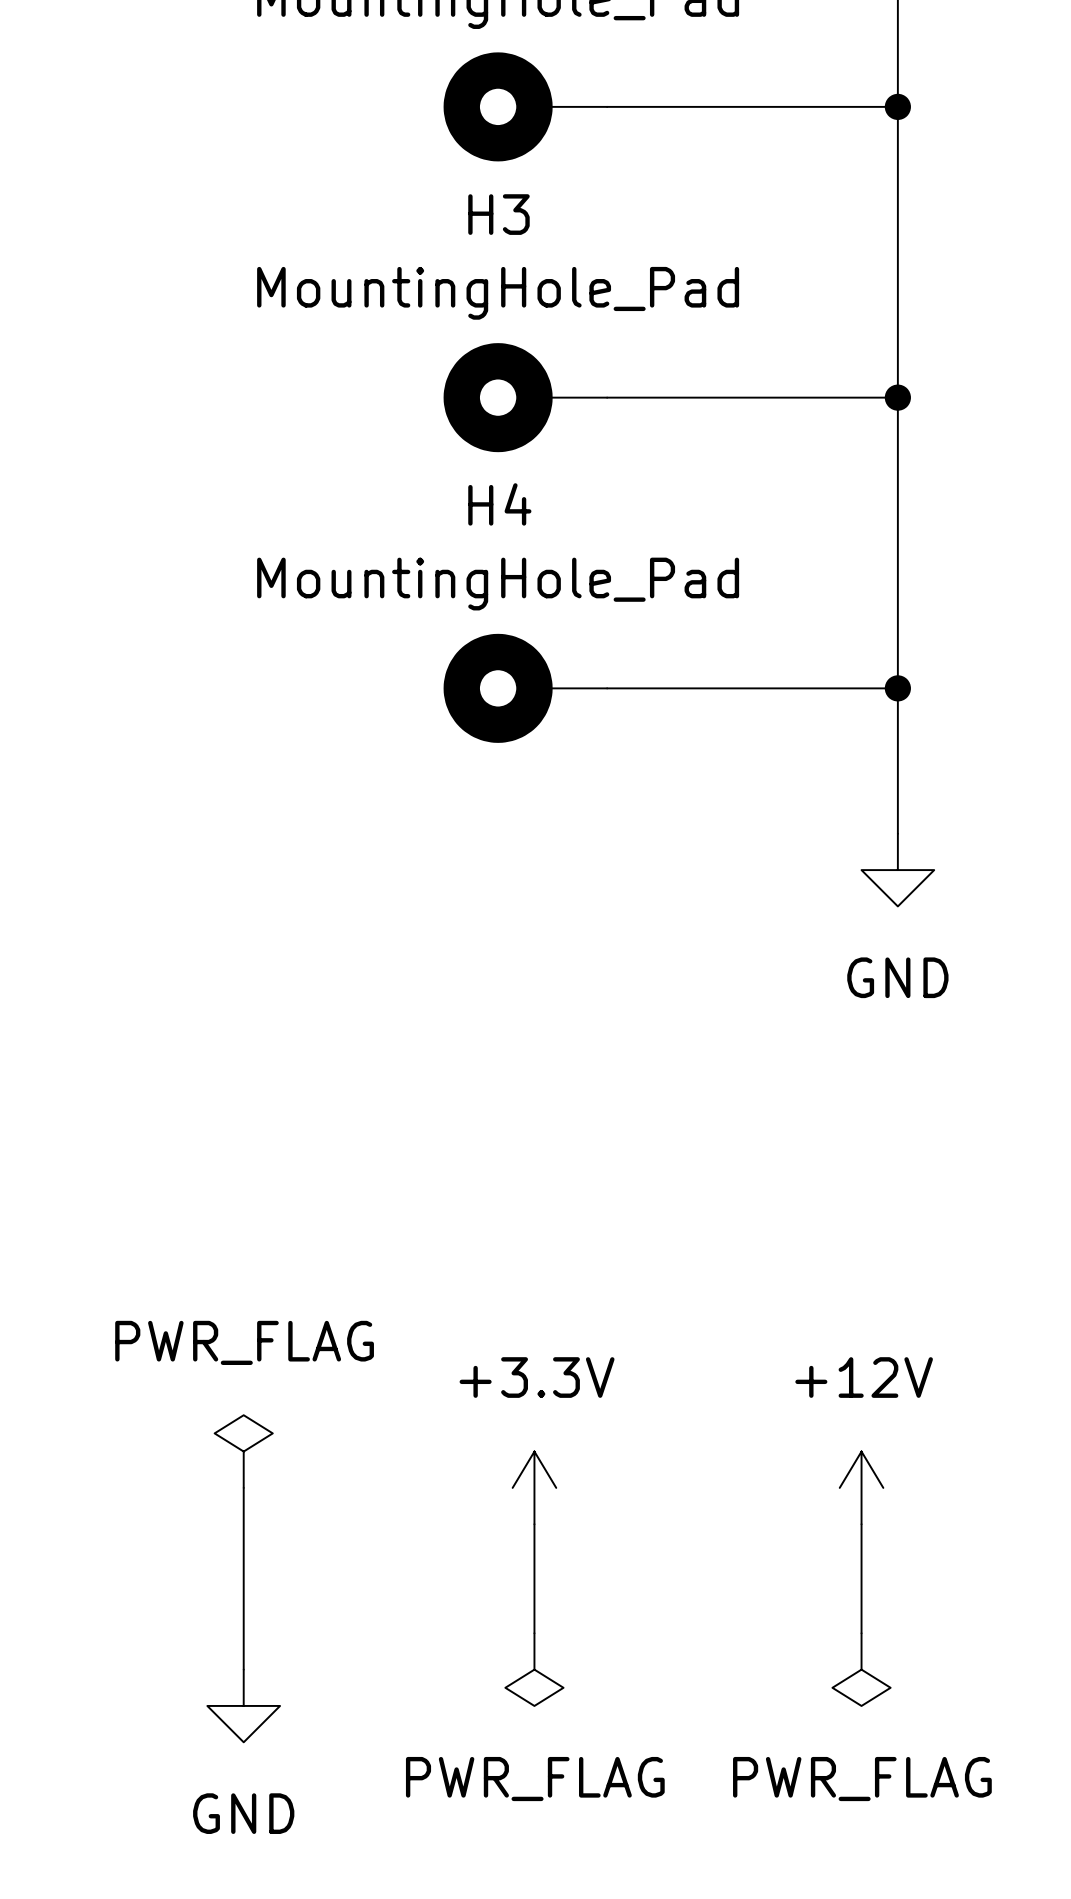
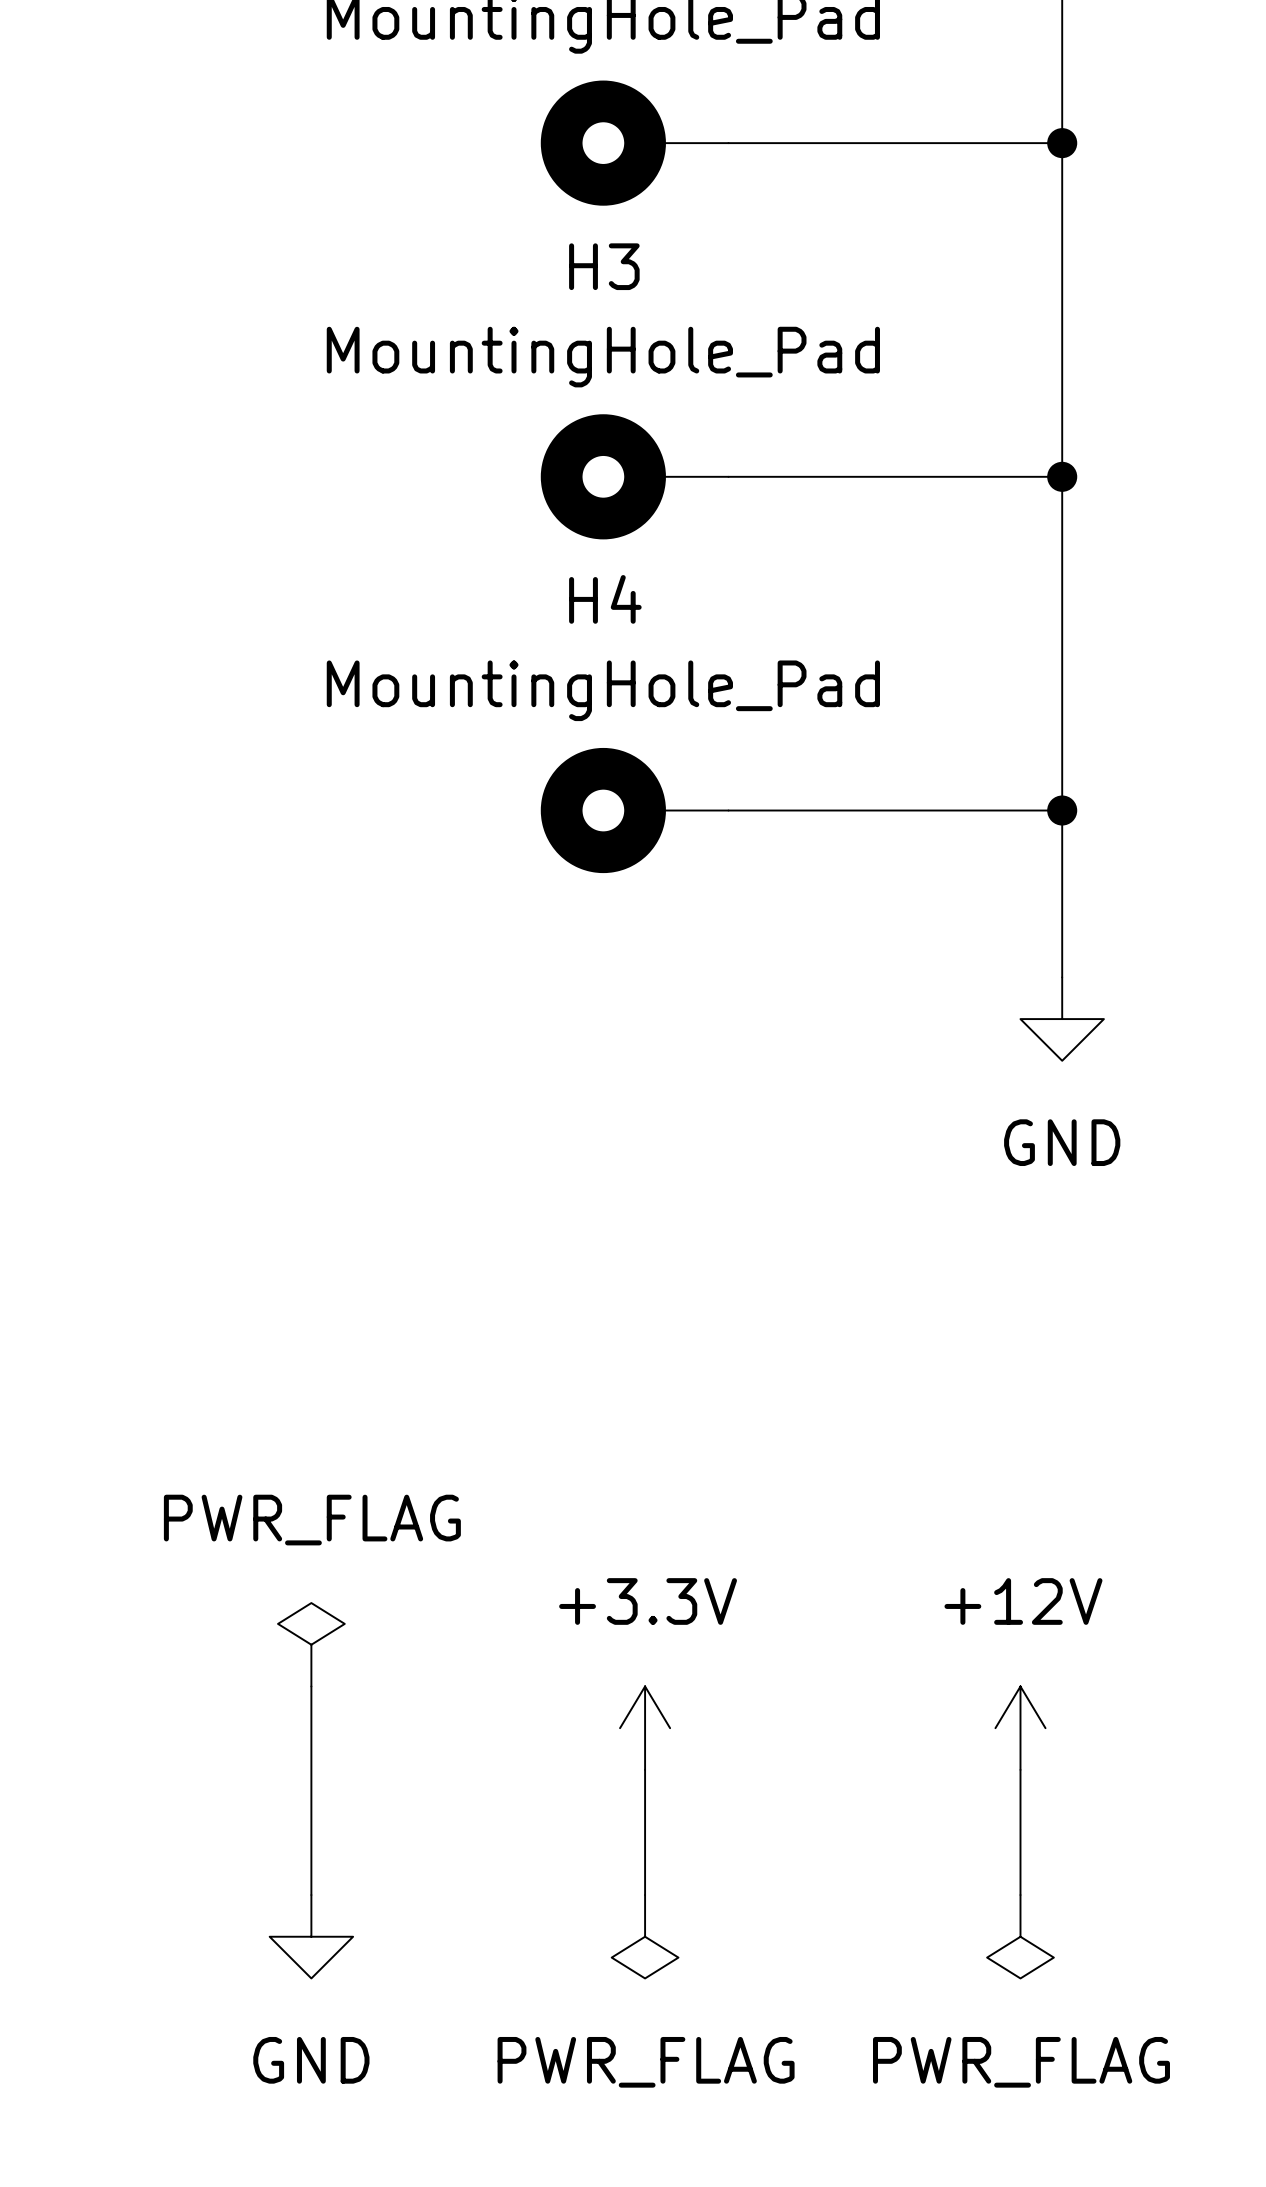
power symbol position: PWR_FLAG (243, 1451) -> PWR_FLAG (311, 1644)
power symbol position: GND (243, 1705) -> GND (311, 1936)

